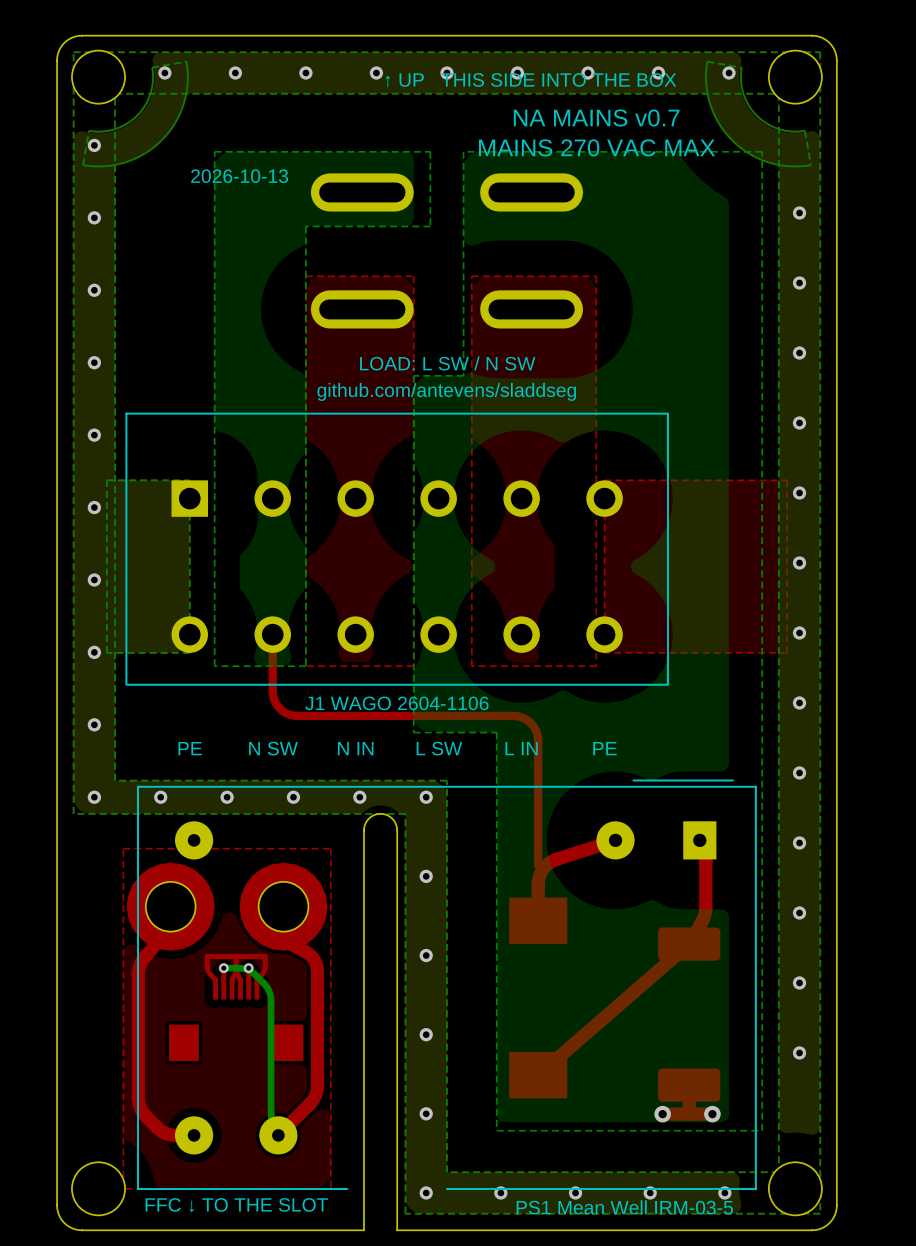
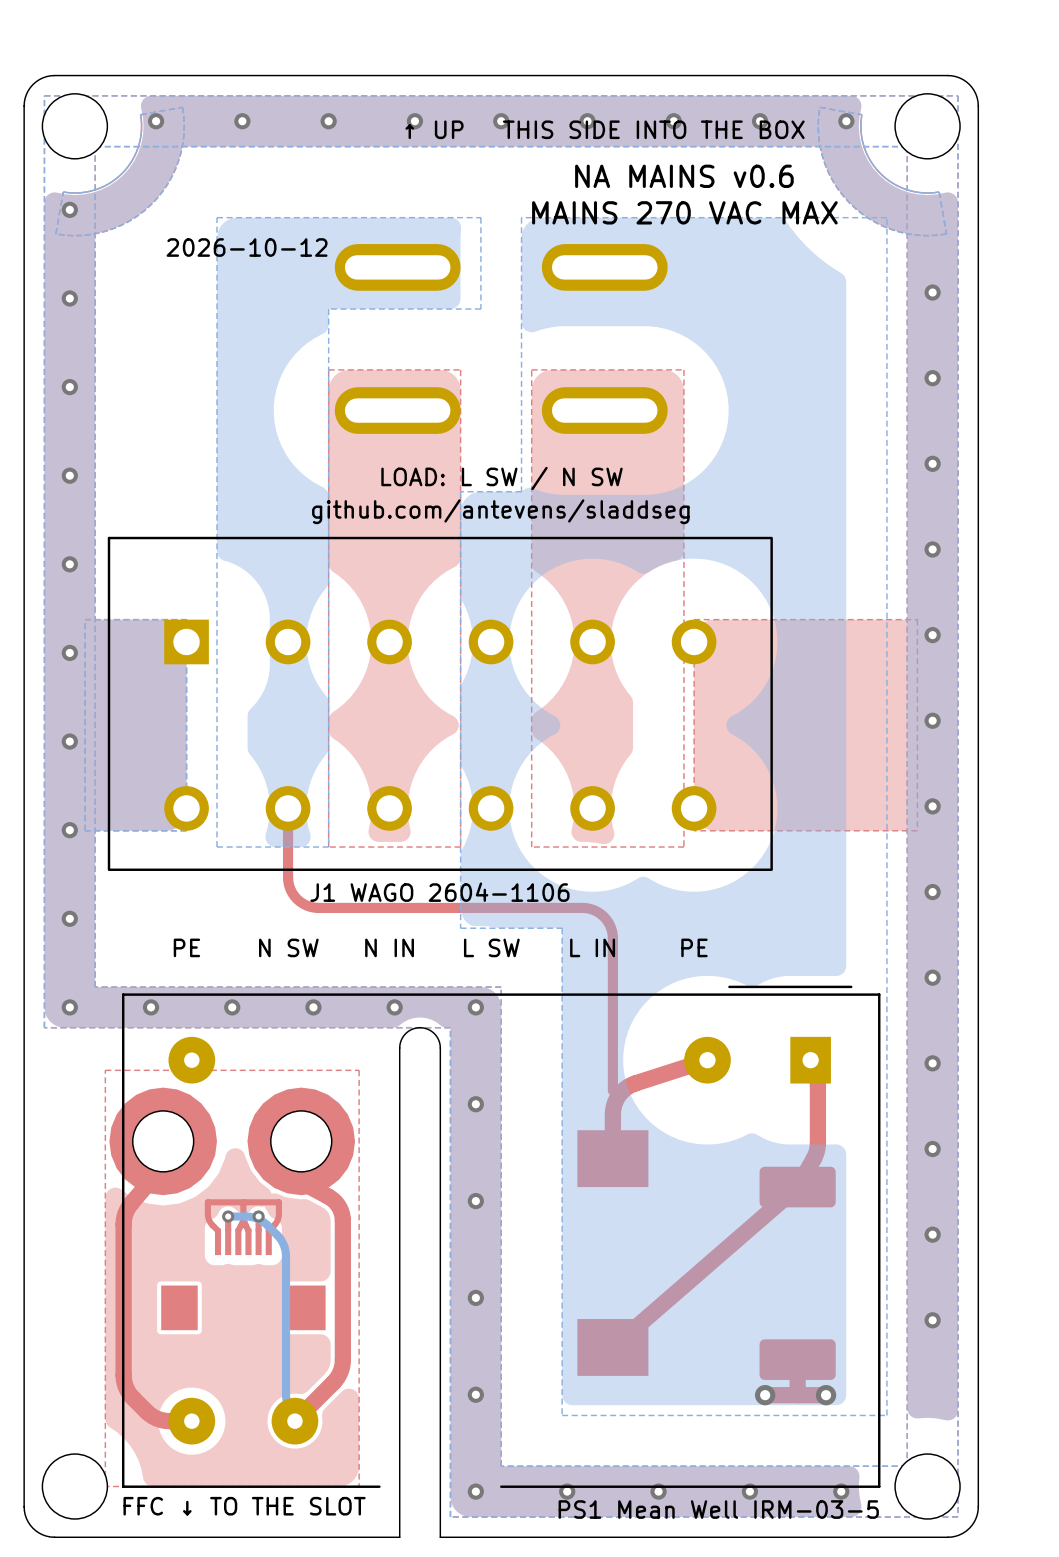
text: NA MAINS v0.7 (596, 118) -> NA MAINS v0.6 (684, 176)
text: 2026-10-13 (239, 176) -> 2026-10-12 (247, 247)

